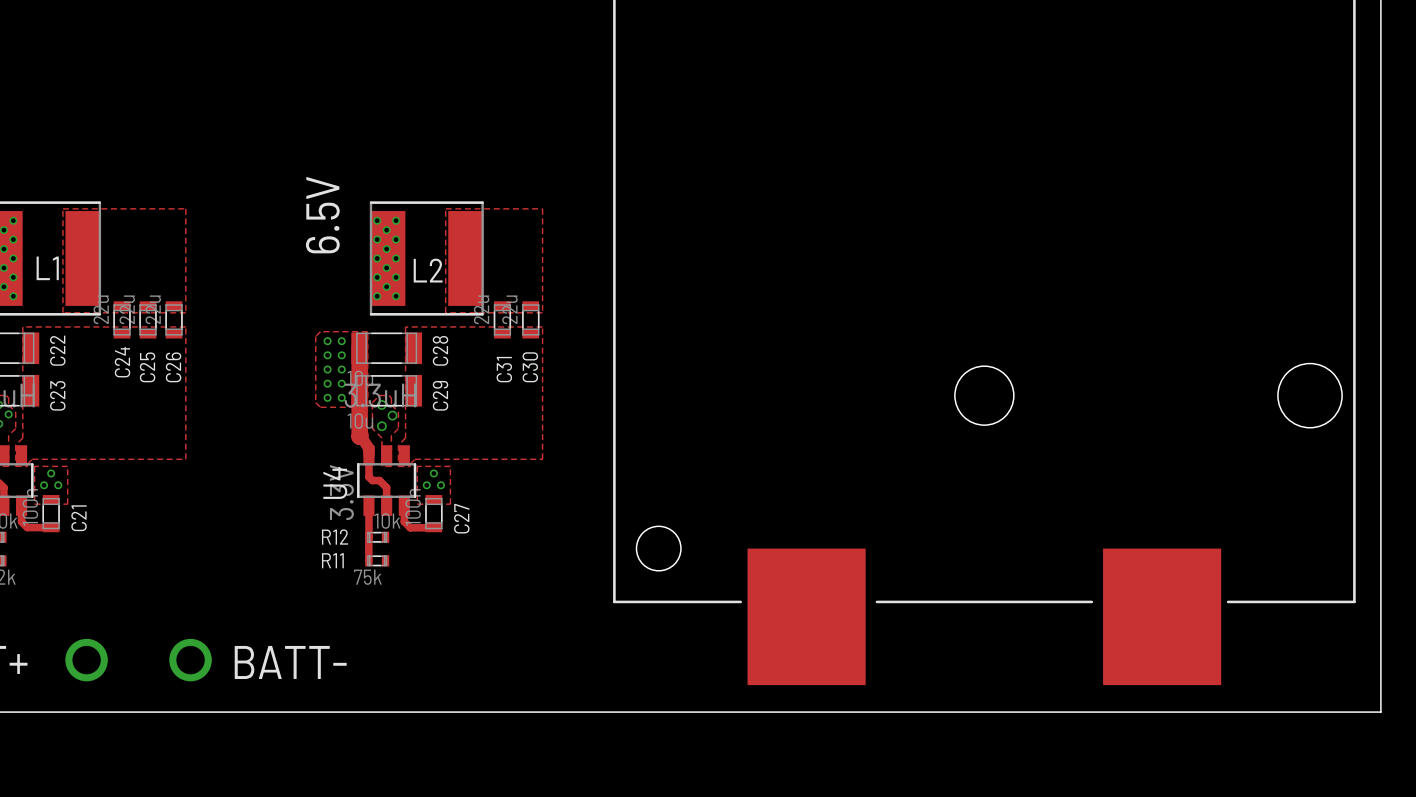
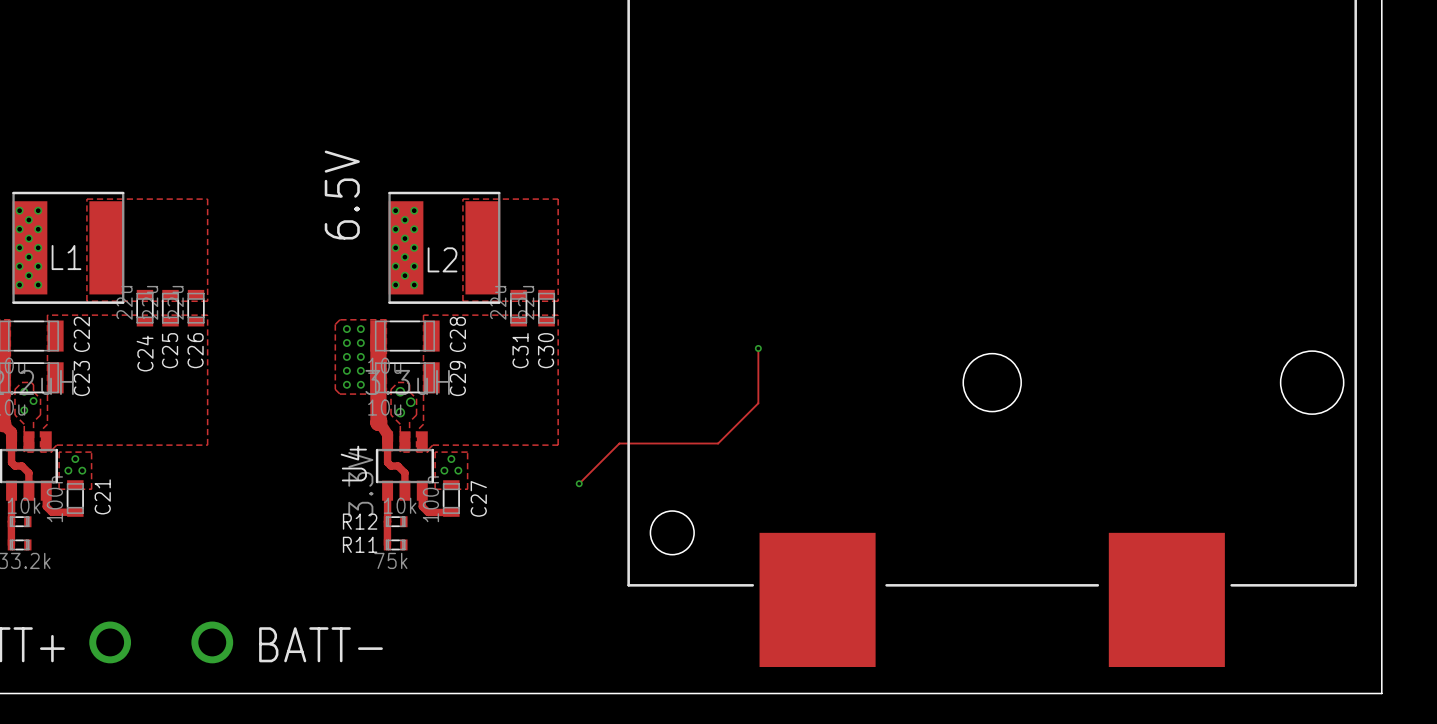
track: none -> (758, 348) (758, 403) (718, 443) (619, 443) (579, 483)
via: none -> (758, 348)
via: none -> (579, 483)

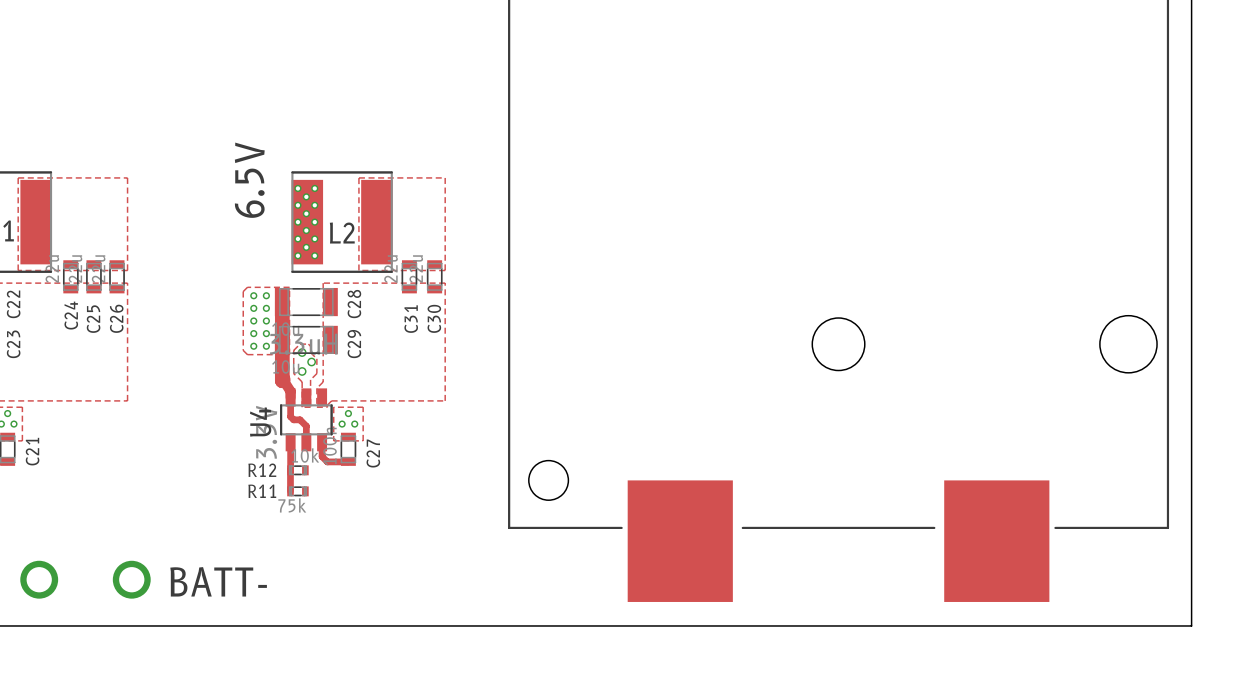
track: (758, 348) (758, 403) (718, 443) (619, 443) (579, 483) -> none
via: (758, 348) -> none
via: (579, 483) -> none

